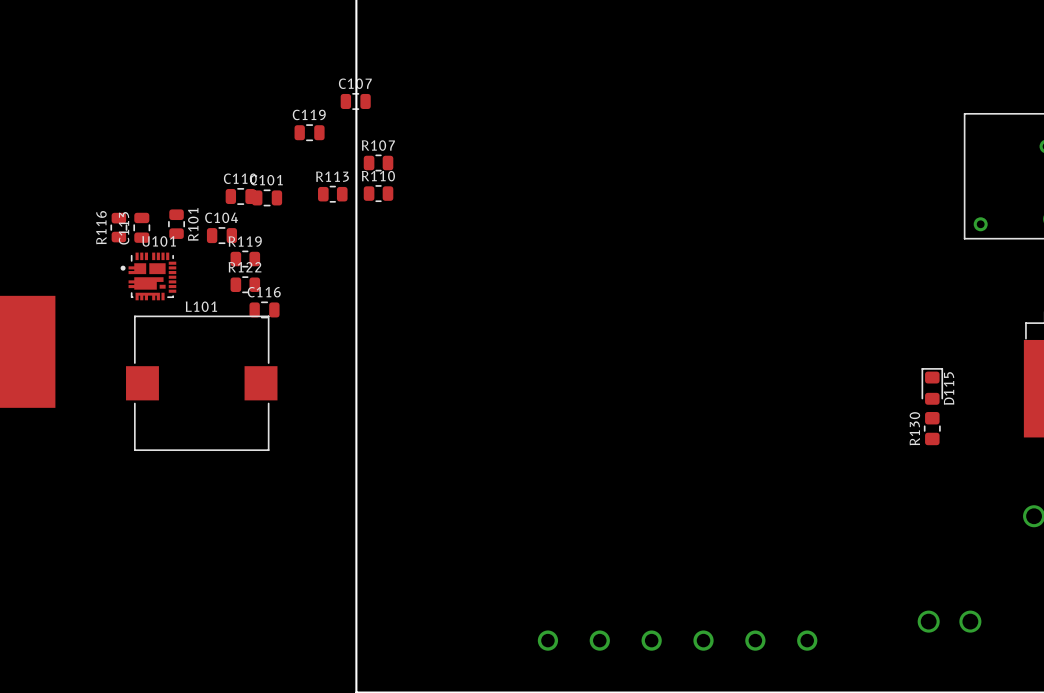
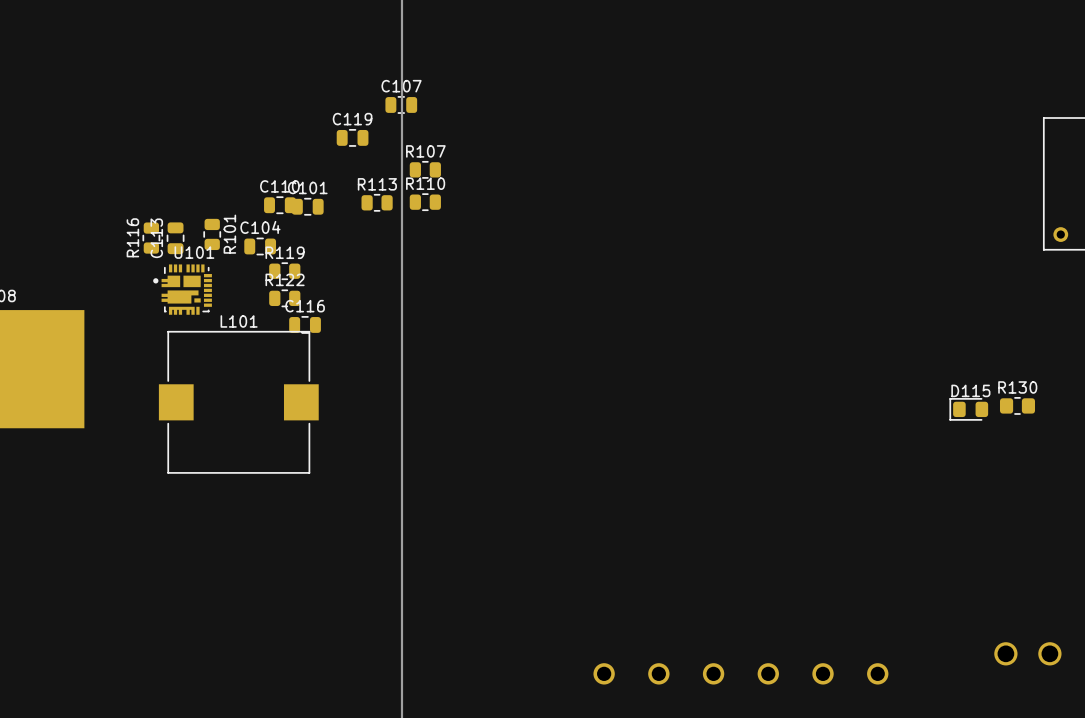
D115 rotation: 0° (932, 386) -> 90° counterclockwise (968, 409)
D115 position: (932, 386) -> (968, 409)
R130 rotation: 0° (932, 428) -> 90° clockwise (1017, 405)
R130 position: (932, 428) -> (1017, 405)

